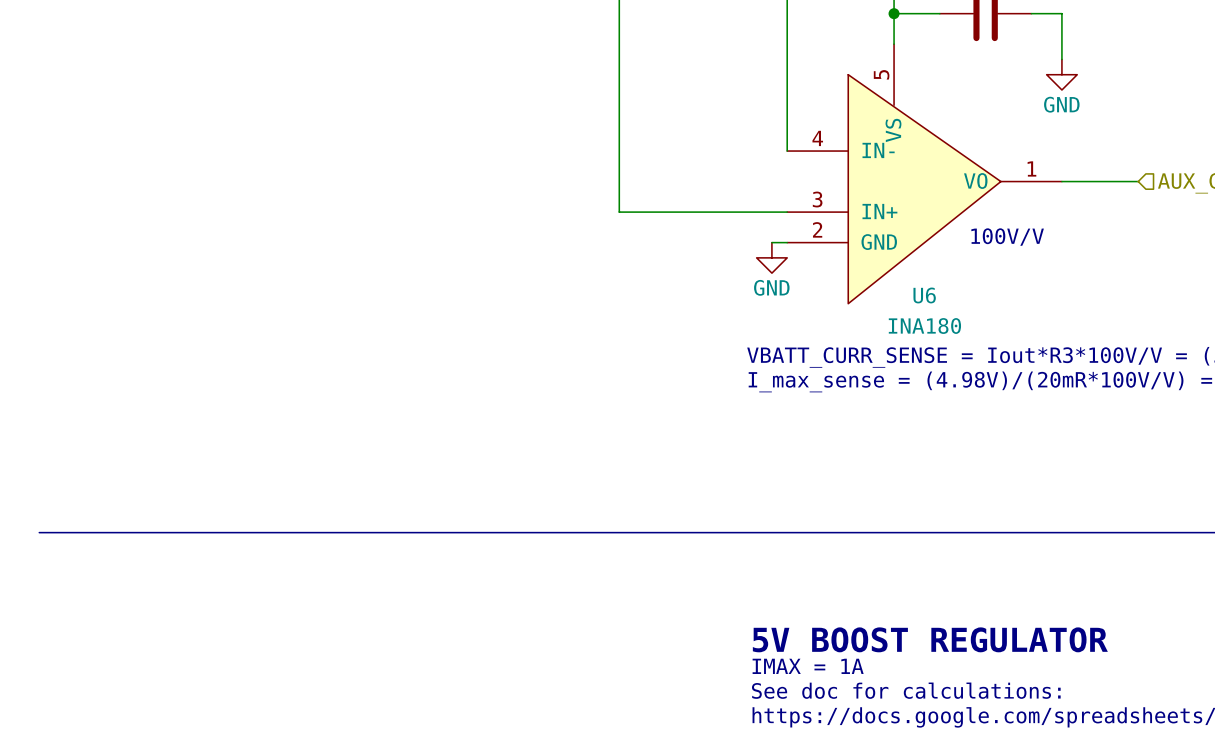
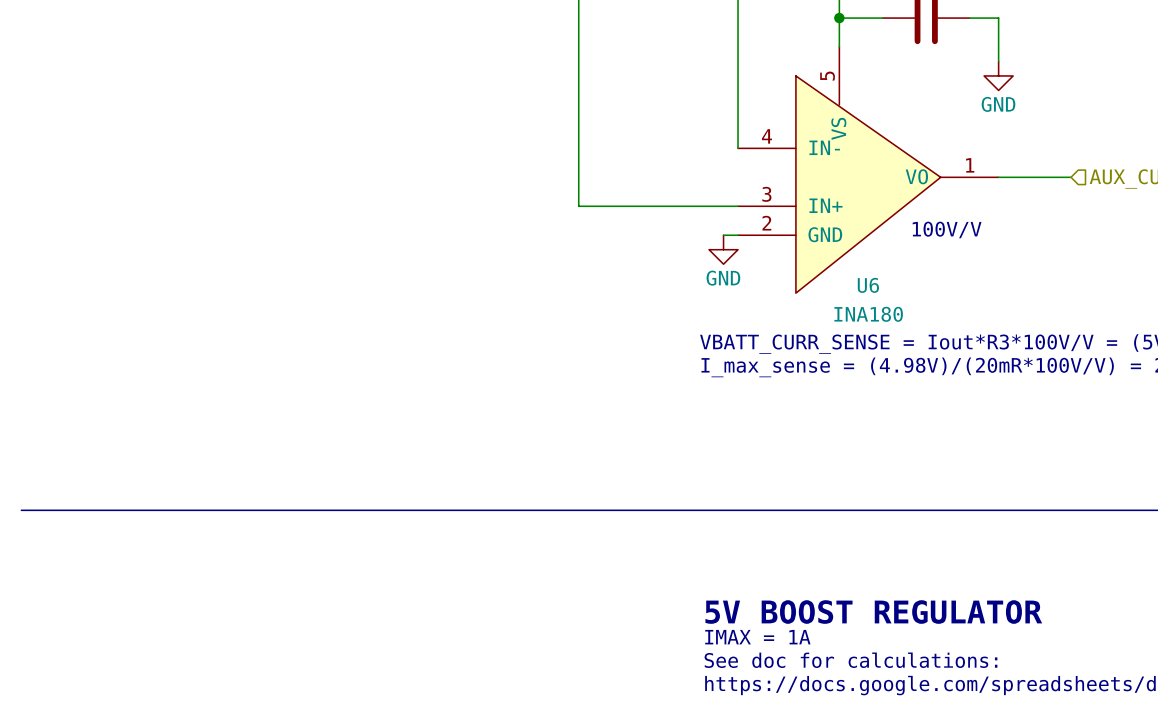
line: none -> (21, 510) (28, 510)

